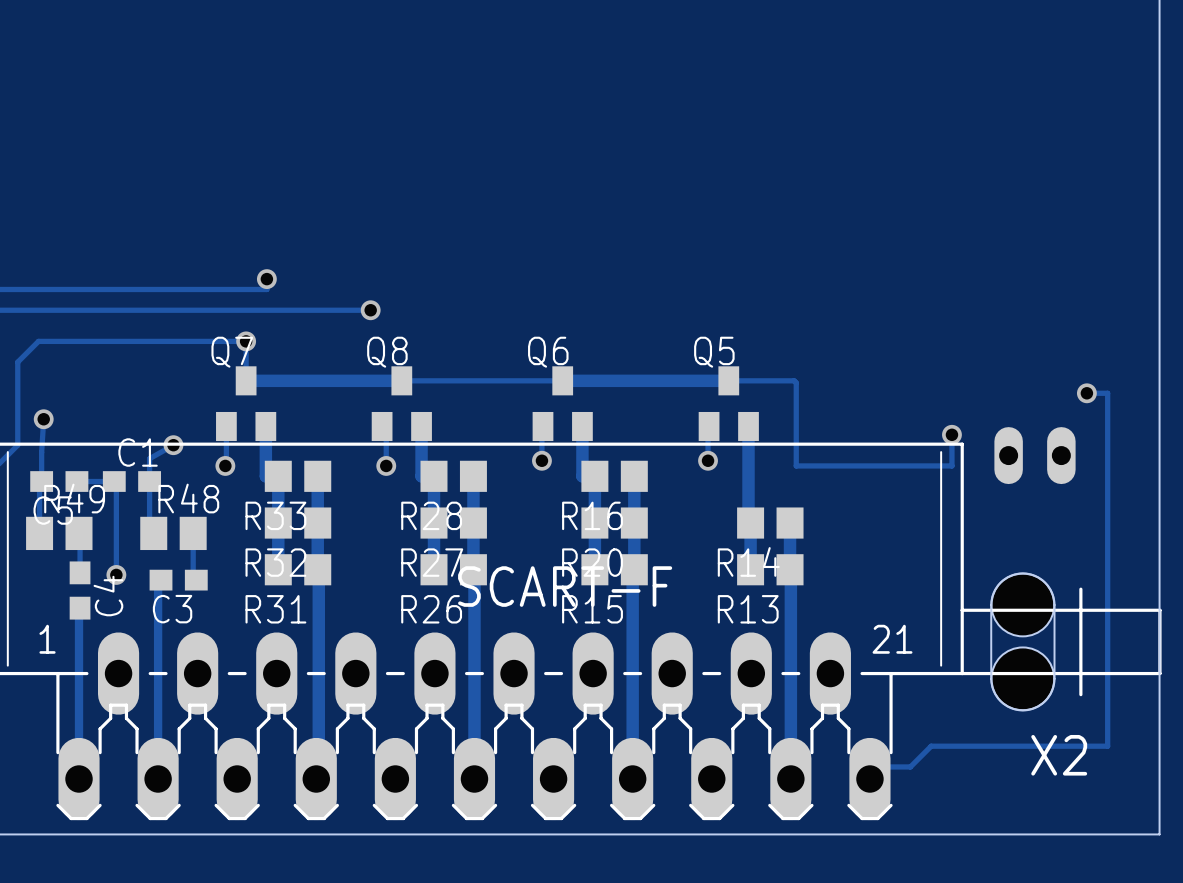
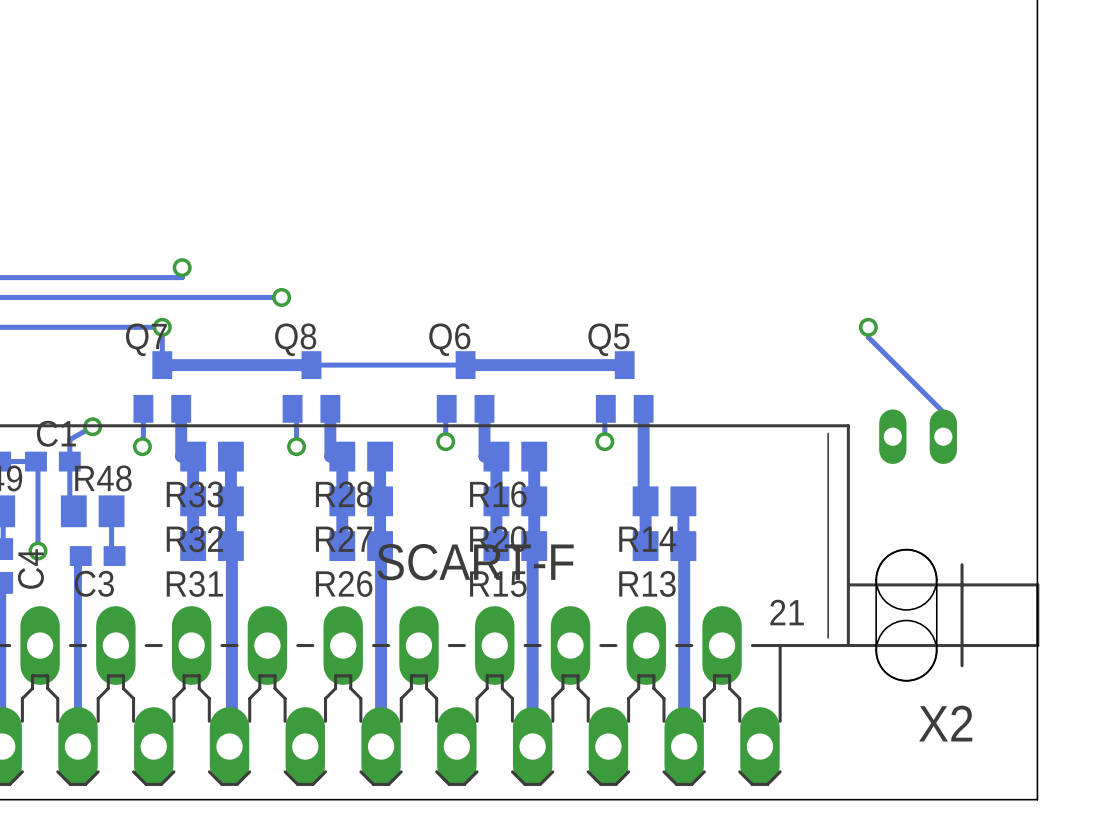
track: none -> (868, 327) (868, 337) (947, 416) (947, 432) (943, 436)
via: none -> (868, 327)
track: (728, 380) (794, 380) (796, 382) (796, 465) (951, 465) (951, 434) -> none
track: (1086, 393) (1107, 393) (1107, 746) (931, 746) (910, 766) (882, 766) (869, 779) -> none
via: (1086, 393) -> none
via: (951, 434) -> none

